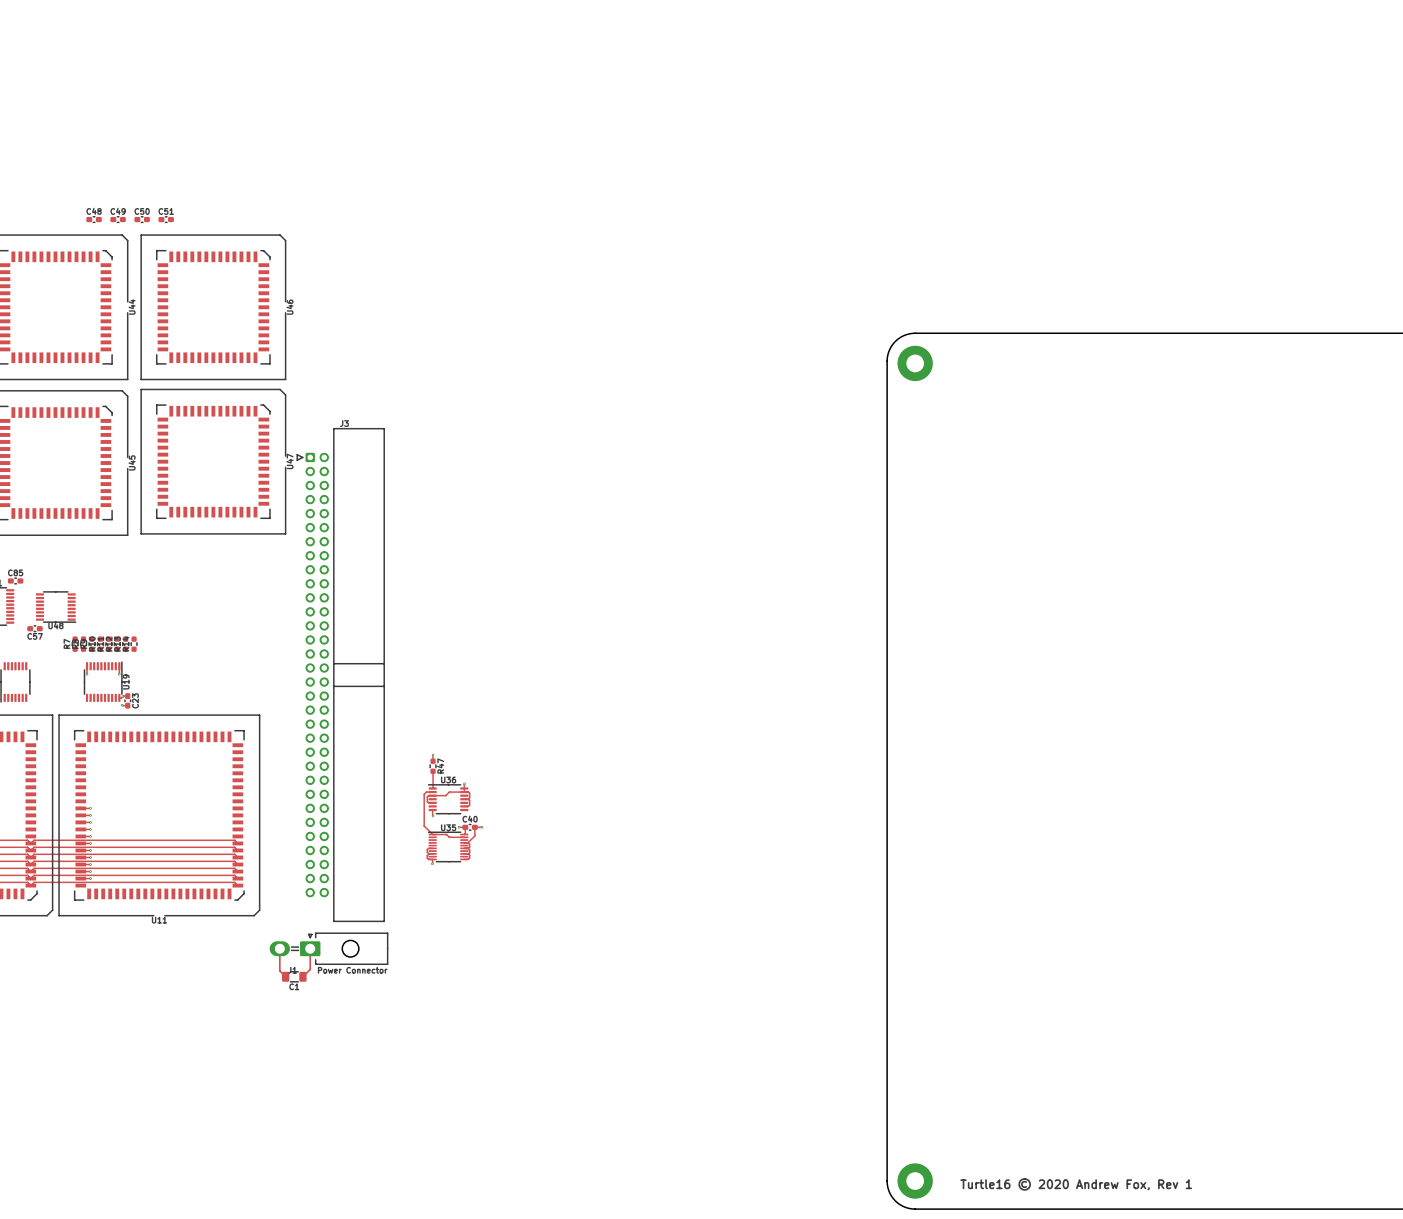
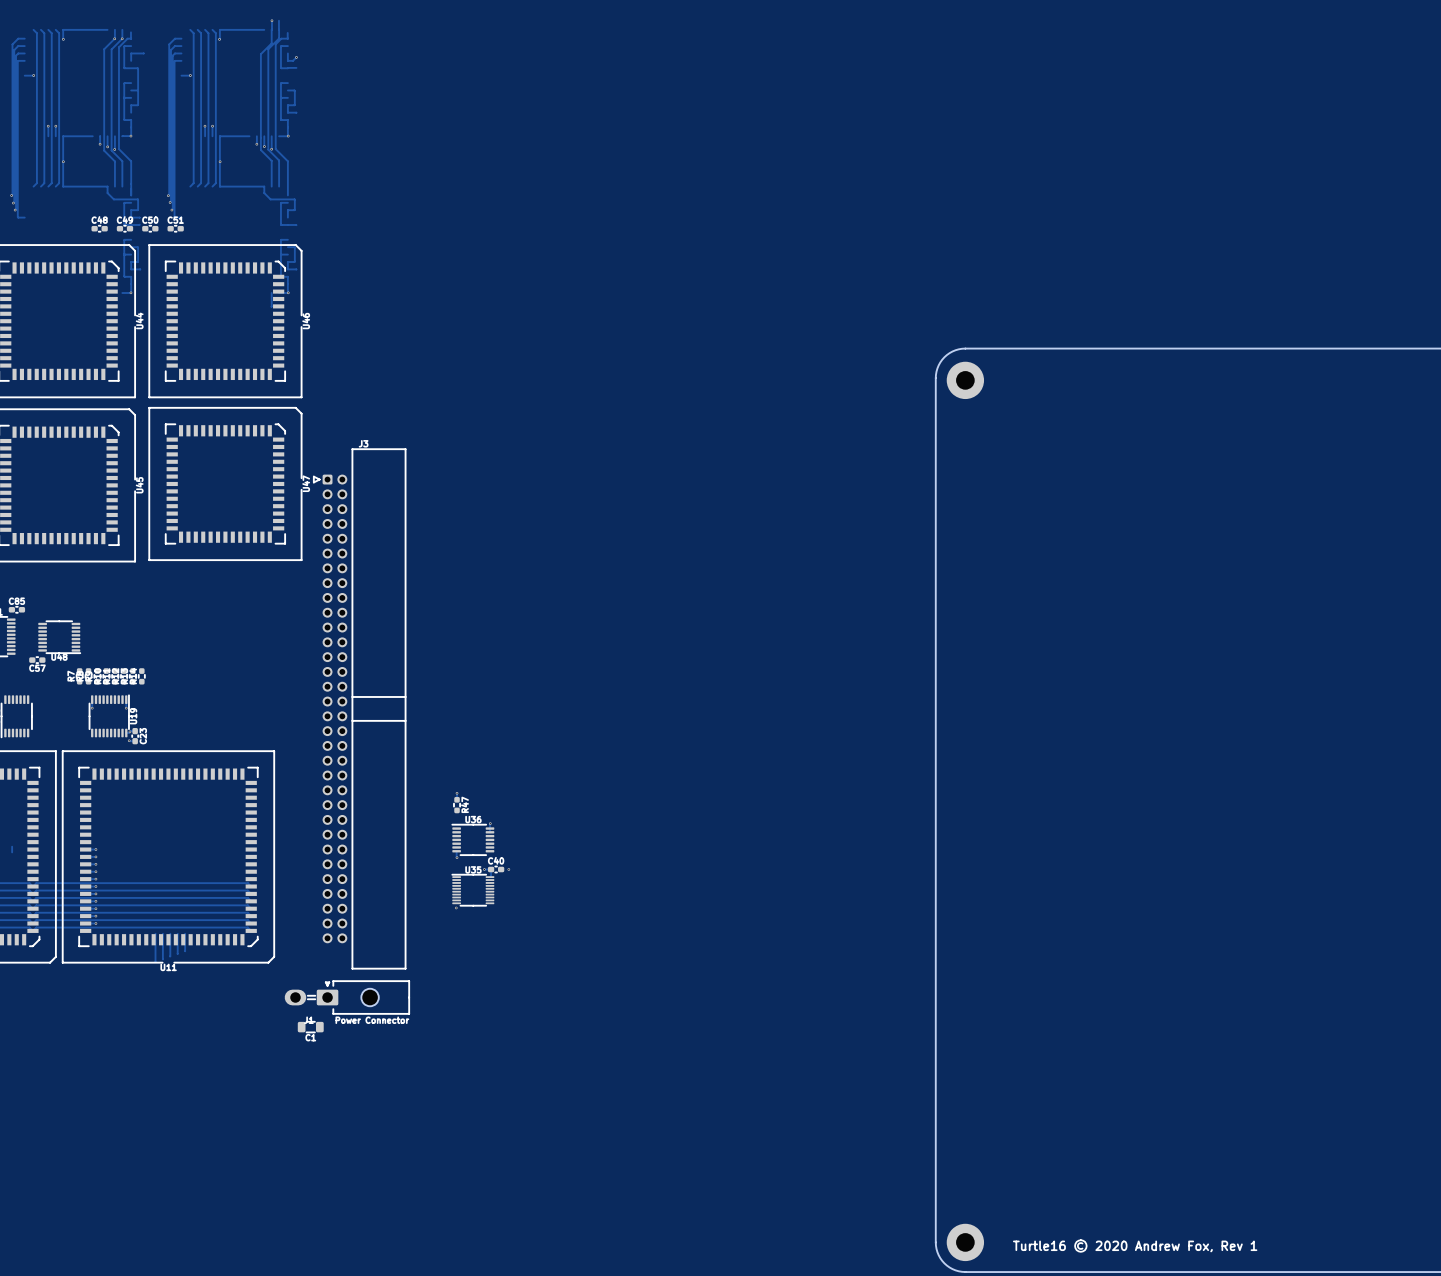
track: none -> (271, 20) (271, 43) (260, 54) (260, 150) (271, 160) (271, 186)
via: none -> (271, 20)
track: none -> (278, 20) (279, 38) (268, 49) (268, 149) (279, 160) (279, 186)
track: none -> (33, 29) (36, 33) (36, 183) (33, 186)
track: none -> (40, 29) (44, 33) (44, 183) (40, 186)
track: none -> (48, 29) (51, 33) (51, 183) (48, 186)
track: none -> (55, 29) (59, 33) (59, 183) (55, 186)
track: none -> (107, 29) (63, 29) (63, 39)
track: none -> (114, 29) (114, 38) (104, 49) (104, 150) (114, 161) (114, 186)
track: none -> (122, 29) (122, 38) (111, 49) (111, 150) (122, 161) (122, 186)
track: none -> (190, 29) (193, 33) (193, 183) (190, 186)
track: none -> (197, 29) (201, 33) (201, 183) (197, 186)
track: none -> (205, 29) (208, 33) (208, 183) (205, 186)
track: none -> (212, 29) (215, 33) (215, 183) (212, 186)
track: none -> (264, 29) (219, 29) (219, 39)
track: none -> (130, 32) (131, 38) (127, 38) (118, 47) (118, 149) (131, 161) (131, 195)
track: none -> (287, 32) (287, 38) (281, 38) (275, 44) (275, 149) (287, 161) (287, 195)
track: none -> (24, 38) (18, 38) (12, 44) (11, 195)
via: none -> (63, 39)
via: none -> (114, 38)
via: none -> (122, 38)
track: none -> (181, 38) (174, 38) (169, 44) (168, 195)
via: none -> (219, 39)
track: none -> (24, 46) (18, 46) (14, 50) (13, 203)
track: none -> (131, 46) (124, 46) (124, 67) (138, 68) (137, 90)
track: none -> (181, 46) (174, 46) (170, 50) (170, 202)
track: none -> (287, 46) (280, 46) (280, 67) (296, 67)
track: none -> (24, 53) (18, 53) (16, 55) (15, 210)
track: none -> (143, 53) (131, 53) (131, 60)
track: none -> (181, 53) (174, 53) (172, 55) (171, 210)
track: none -> (287, 53) (287, 60) (293, 60) (296, 57)
via: none -> (296, 57)
track: none -> (24, 60) (17, 61) (17, 217) (24, 217)
track: none -> (181, 60) (174, 61) (174, 217) (181, 217)
track: none -> (33, 75) (24, 75)
via: none -> (33, 75)
track: none -> (190, 75) (181, 75)
via: none -> (190, 75)
track: none -> (131, 83) (124, 83) (124, 97)
track: none -> (287, 83) (280, 83) (281, 97)
track: none -> (131, 90) (137, 90)
track: none -> (137, 90) (138, 104) (131, 105) (131, 112)
track: none -> (287, 90) (294, 90) (294, 104) (287, 105) (287, 112) (296, 112)
track: none -> (124, 97) (131, 97)
track: none -> (124, 97) (124, 119) (131, 120) (131, 135) (122, 136)
track: none -> (281, 97) (280, 119) (287, 120) (288, 136) (279, 136)
track: none -> (281, 97) (287, 97)
track: none -> (48, 126) (48, 136)
via: none -> (48, 126)
track: none -> (55, 126) (55, 136)
via: none -> (55, 126)
track: none -> (204, 126) (205, 136)
via: none -> (204, 126)
track: none -> (212, 126) (212, 136)
via: none -> (212, 126)
track: none -> (92, 136) (63, 136) (63, 186) (107, 186) (107, 193) (113, 199) (137, 199) (138, 209) (131, 210) (131, 217) (139, 217)
track: none -> (100, 136) (100, 144)
track: none -> (107, 136) (107, 146)
track: none -> (114, 136) (114, 149)
via: none -> (130, 136)
track: none -> (249, 136) (219, 136) (219, 186) (264, 186) (264, 193) (270, 199) (294, 199) (294, 209) (287, 210) (287, 217)
track: none -> (256, 136) (256, 144)
track: none -> (264, 136) (264, 146)
track: none -> (271, 136) (271, 149)
via: none -> (288, 136)
via: none -> (100, 144)
via: none -> (256, 144)
via: none -> (107, 146)
via: none -> (264, 146)
via: none -> (114, 149)
via: none -> (271, 149)
via: none -> (63, 161)
via: none -> (220, 161)
via: none -> (11, 195)
via: none -> (168, 195)
via: none -> (170, 202)
via: none -> (13, 203)
track: none -> (131, 202) (124, 203) (124, 224) (139, 224)
track: none -> (287, 202) (280, 203) (280, 224) (296, 225)
via: none -> (15, 210)
via: none -> (171, 210)
track: none -> (131, 239) (124, 240) (124, 254)
track: none -> (287, 239) (280, 240) (281, 254)
track: none -> (131, 247) (138, 247) (138, 261) (131, 262) (131, 269) (140, 269)
track: none -> (287, 247) (294, 247) (294, 261) (287, 262) (287, 269) (296, 269)
track: none -> (124, 254) (131, 254)
track: none -> (124, 254) (124, 276) (131, 276) (131, 292) (122, 293)
track: none -> (281, 254) (280, 276) (287, 276) (288, 292) (279, 293)
track: none -> (281, 254) (287, 254)
via: none -> (130, 292)
track: none -> (271, 293) (271, 306)
via: none -> (288, 292)
track: (433, 771) (432, 788) -> none
track: (432, 792) (426, 792) (424, 794) (424, 826) (432, 834) (464, 837) -> none
track: (468, 799) (469, 805) (464, 806) -> none
track: (468, 799) (468, 792) (449, 792) (445, 795) (428, 795) (427, 801) (432, 802) -> none
track: none -> (12, 846) (12, 852)
track: (482, 827) (474, 827) (474, 835) (467, 842) -> none
track: (464, 842) (469, 844) (468, 848) (464, 848) -> none
track: (432, 848) (427, 849) (428, 853) -> none
track: (467, 848) (469, 850) (468, 853) -> none
track: (428, 853) (427, 858) (432, 859) (432, 863) -> none
track: (468, 853) (469, 858) (464, 859) -> none
track: none -> (155, 933) (155, 961)
track: none -> (162, 933) (163, 959)
track: none -> (170, 933) (170, 956)
track: none -> (177, 933) (177, 953)
track: none -> (185, 933) (185, 951)
track: (279, 948) (279, 970) (285, 976) -> none
track: (310, 948) (310, 969) (302, 976) -> none

